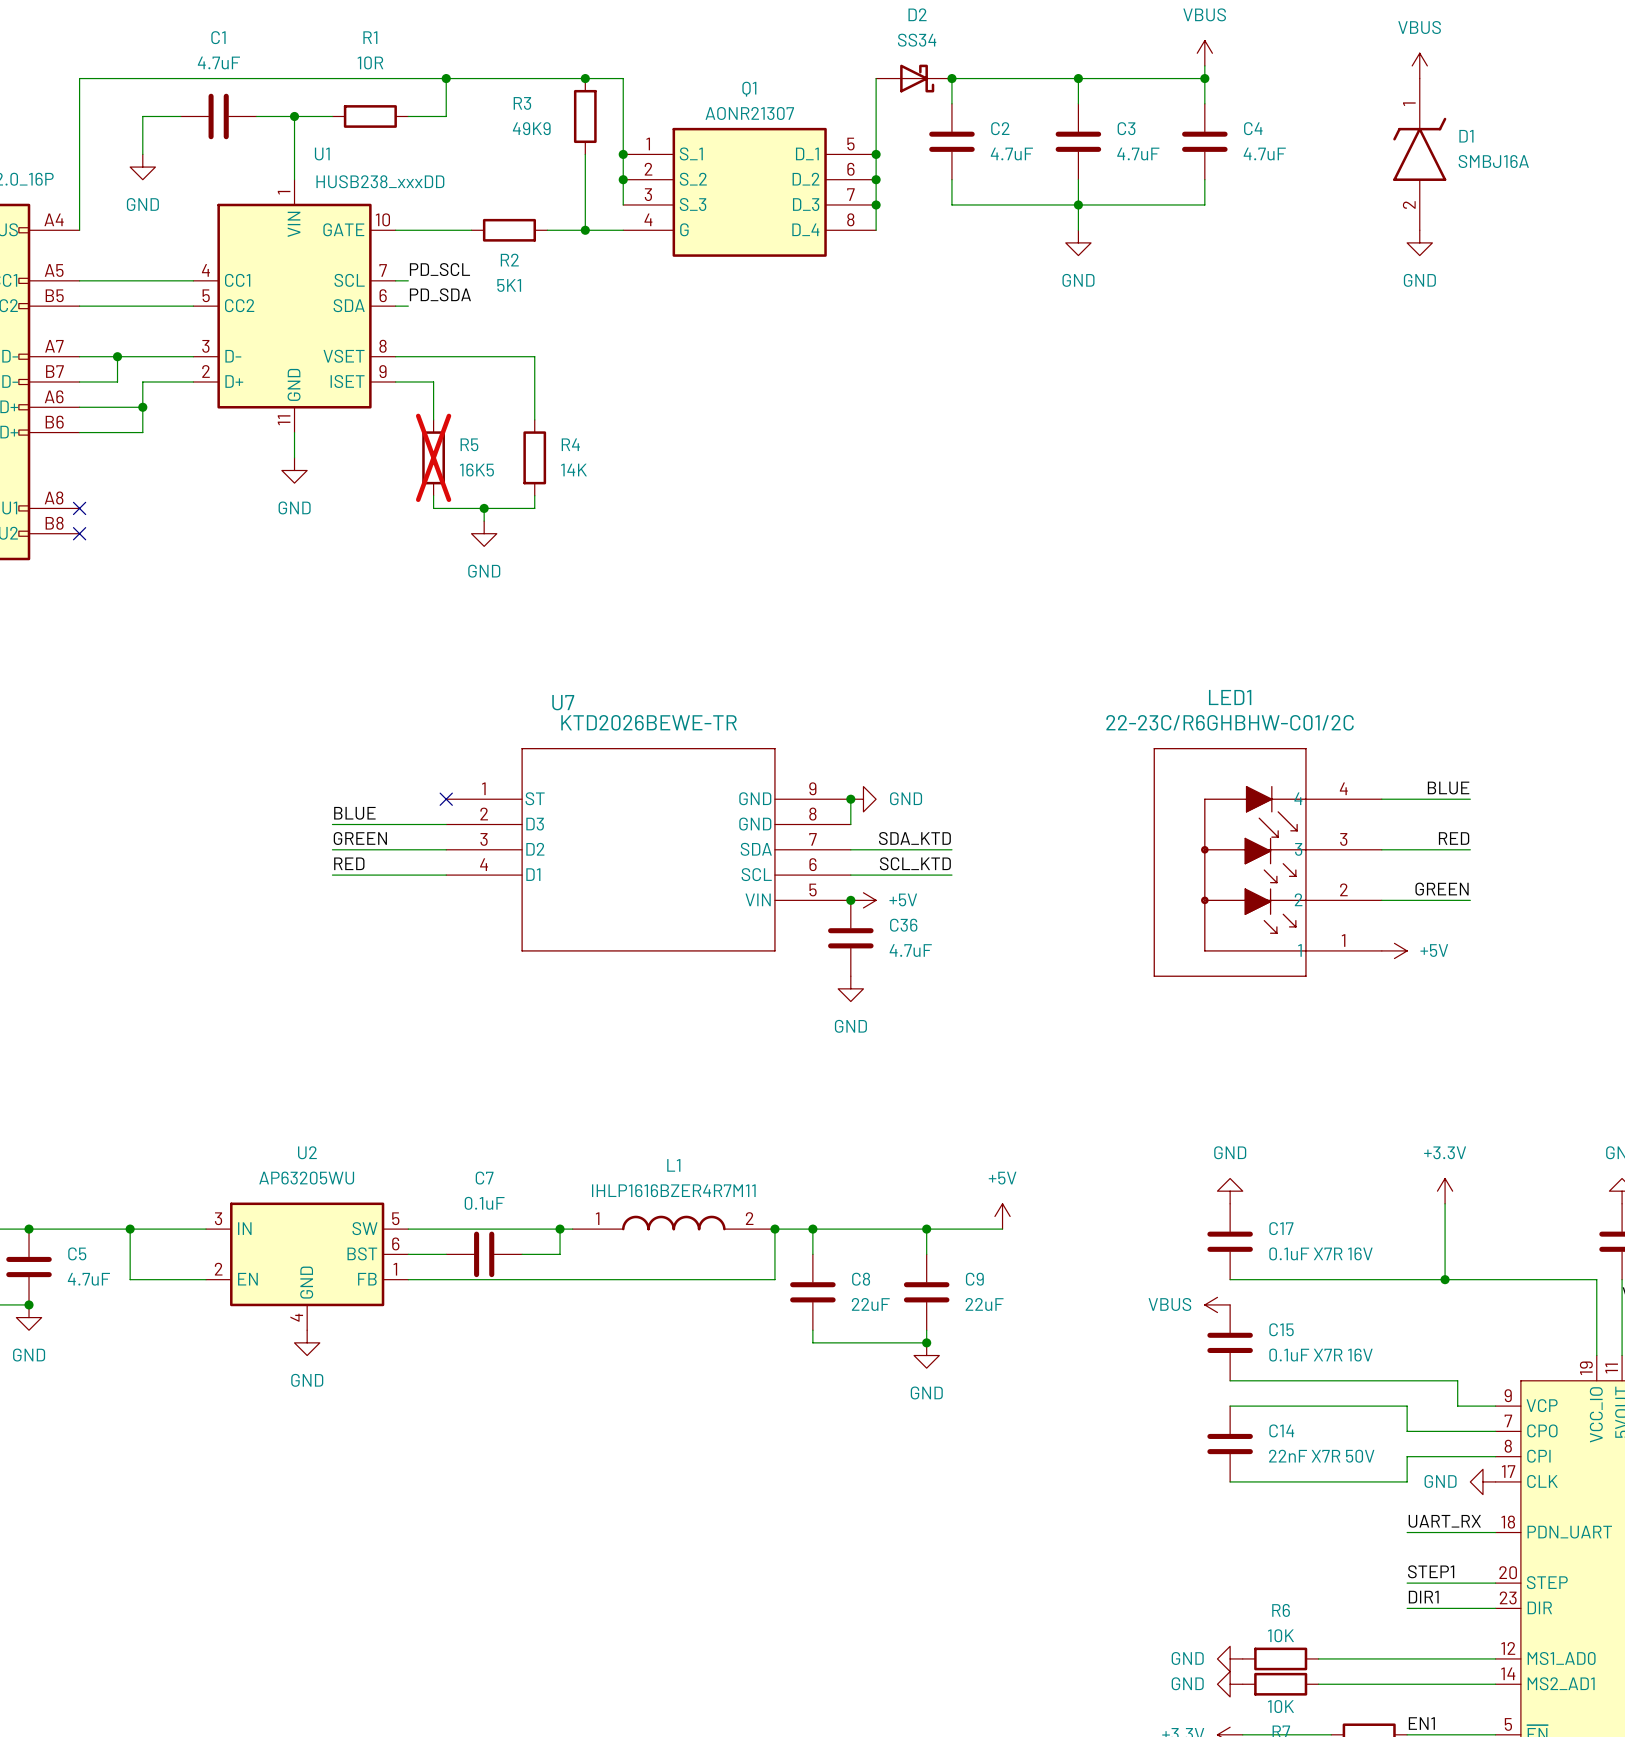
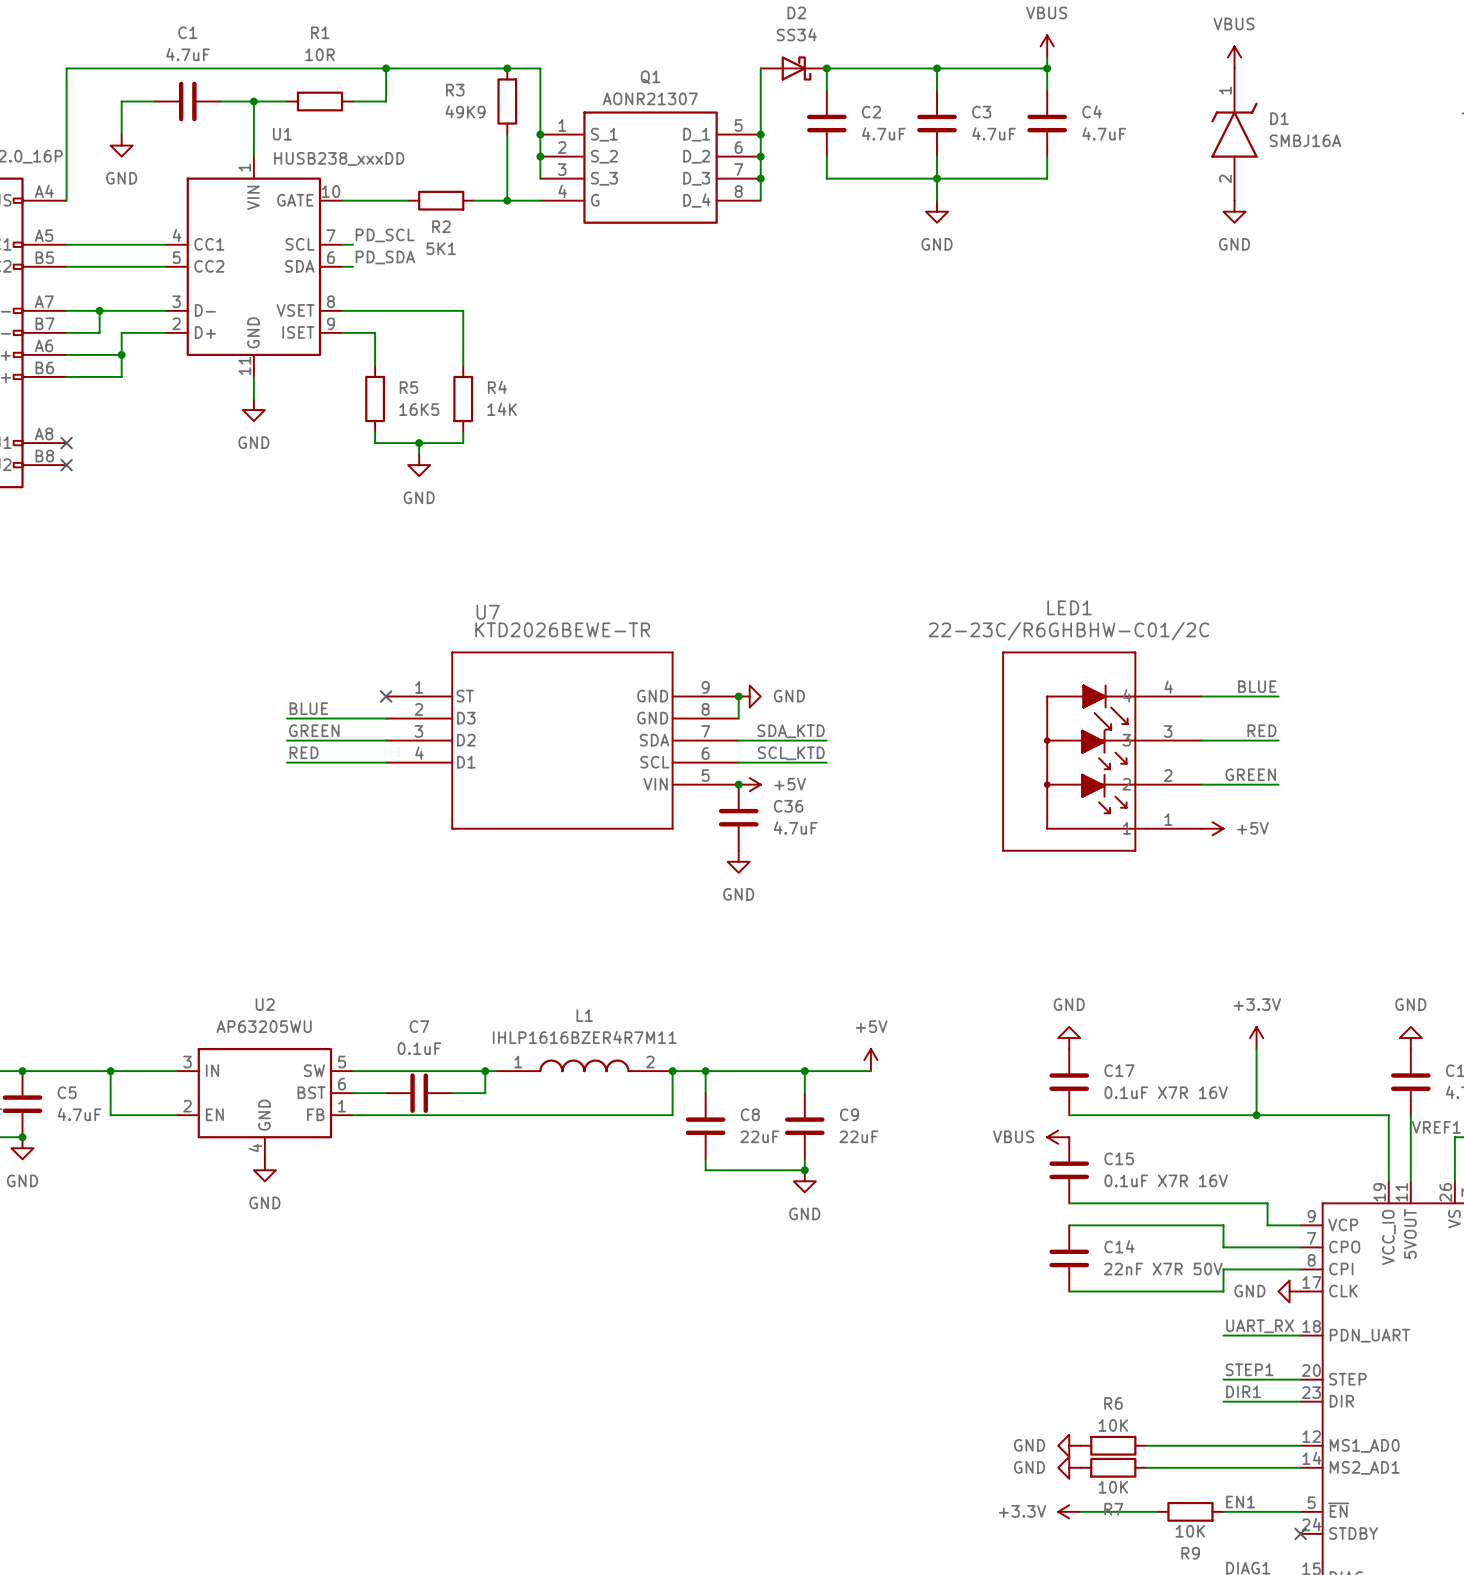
R5 do-not-place cross: (433, 457) -> none

